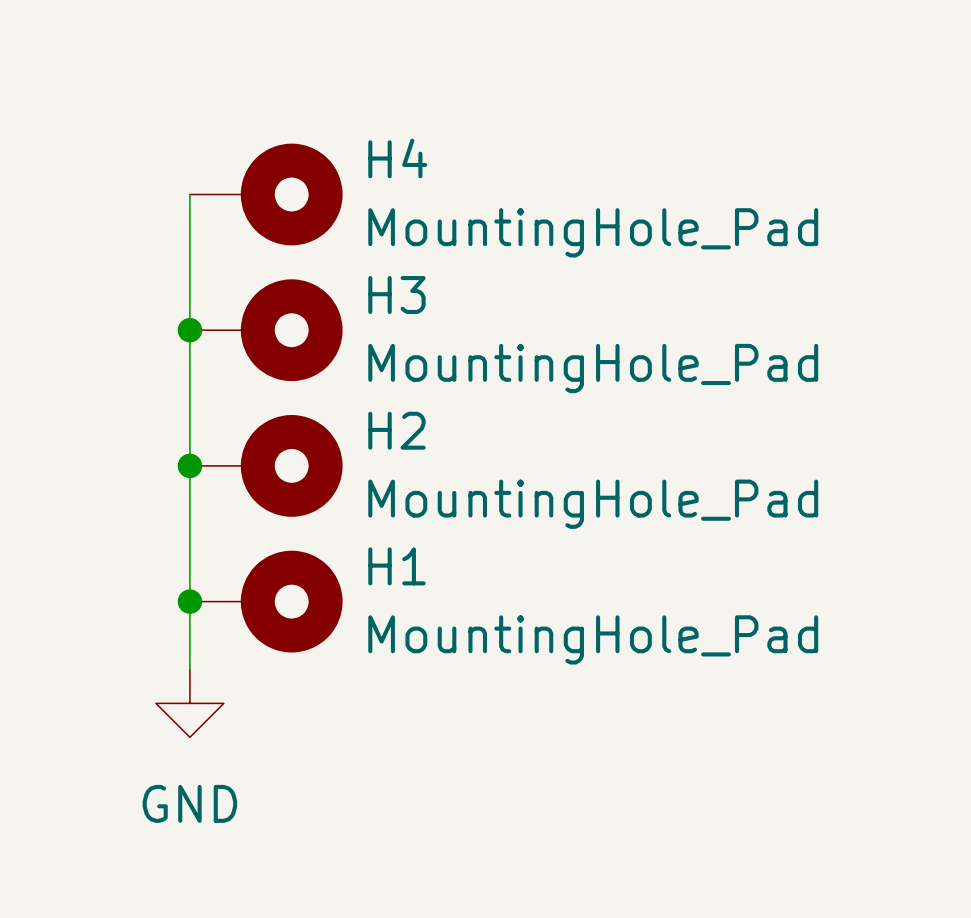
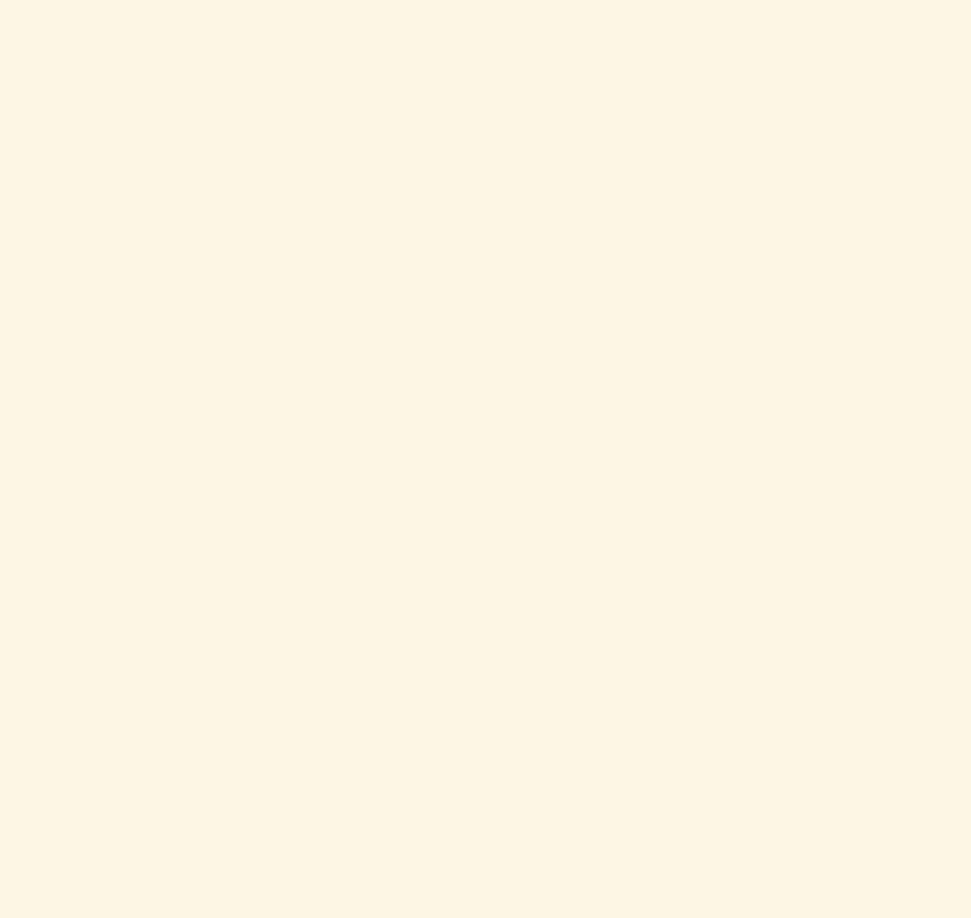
wire: (189, 194) (189, 669) -> none
H4: MountingHole_Pad (266, 194) -> none
junction: (189, 330) -> none
H3: MountingHole_Pad (266, 330) -> none
junction: (189, 465) -> none
H2: MountingHole_Pad (266, 465) -> none
junction: (189, 601) -> none
H1: MountingHole_Pad (266, 601) -> none
power symbol: GND (189, 703) -> none

